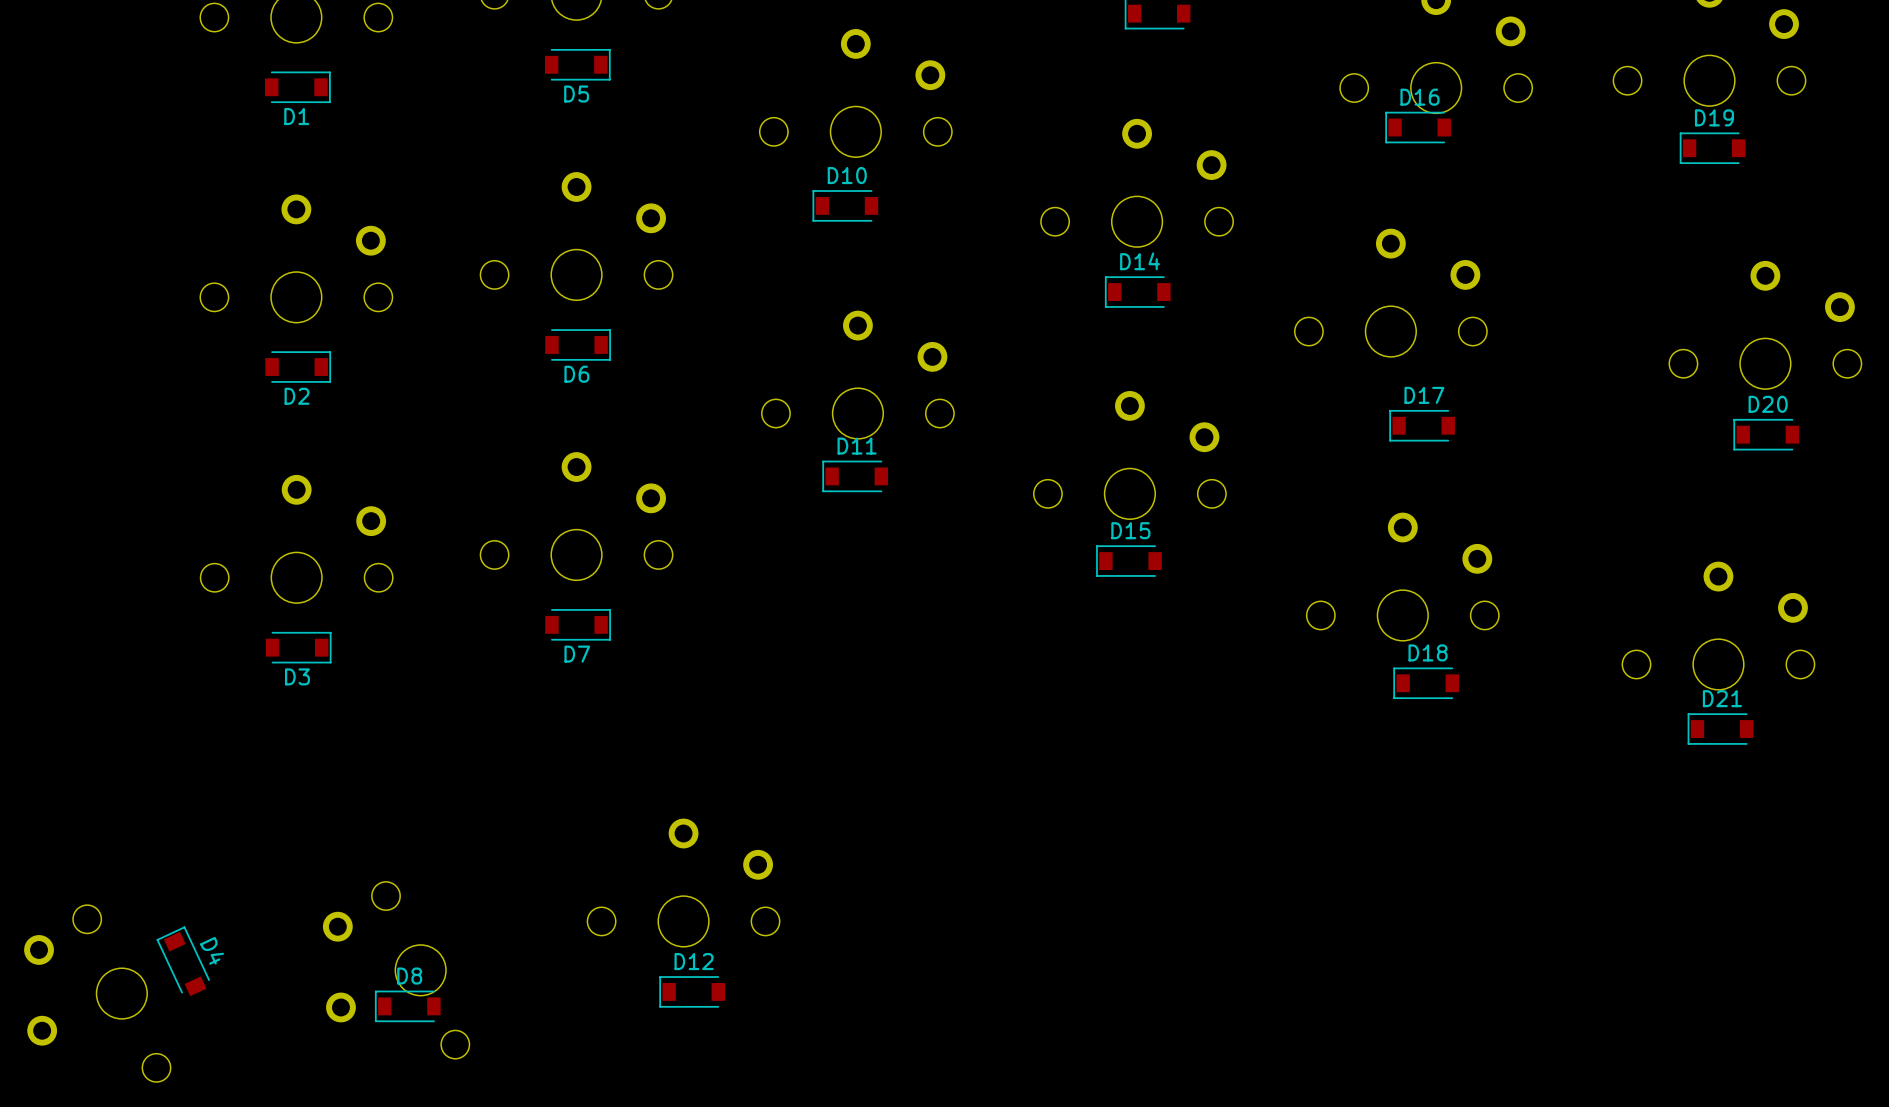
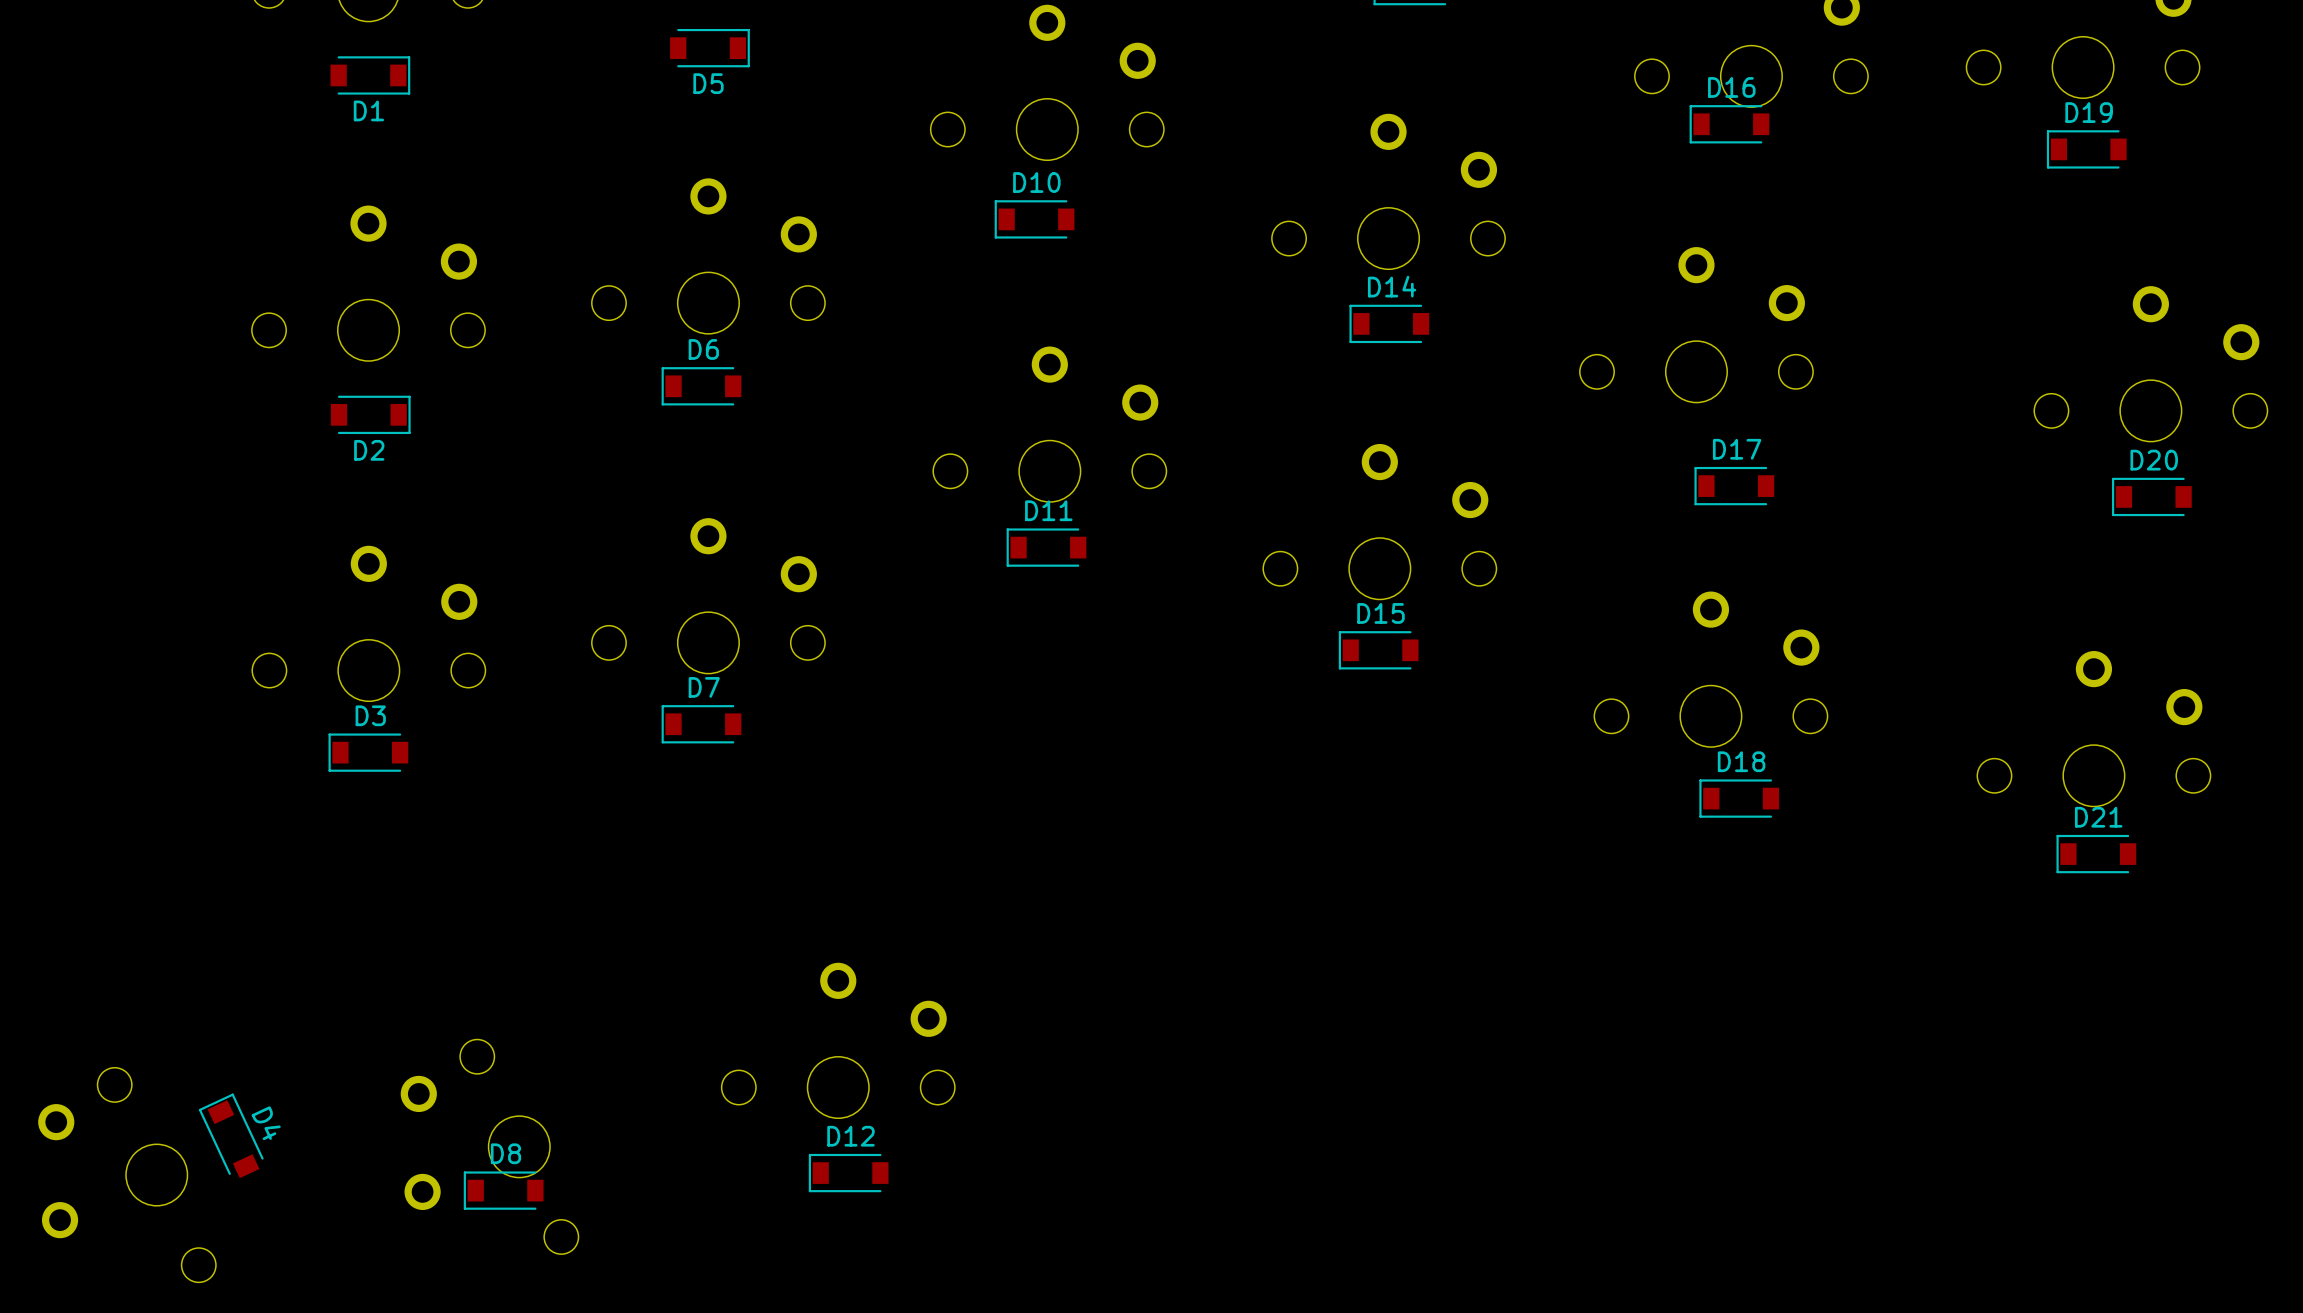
D6 rotation: 0° (578, 344) -> 180° (701, 386)
D7 rotation: 0° (578, 624) -> 180° (701, 724)
D3 rotation: 0° (298, 647) -> 180° (368, 752)

